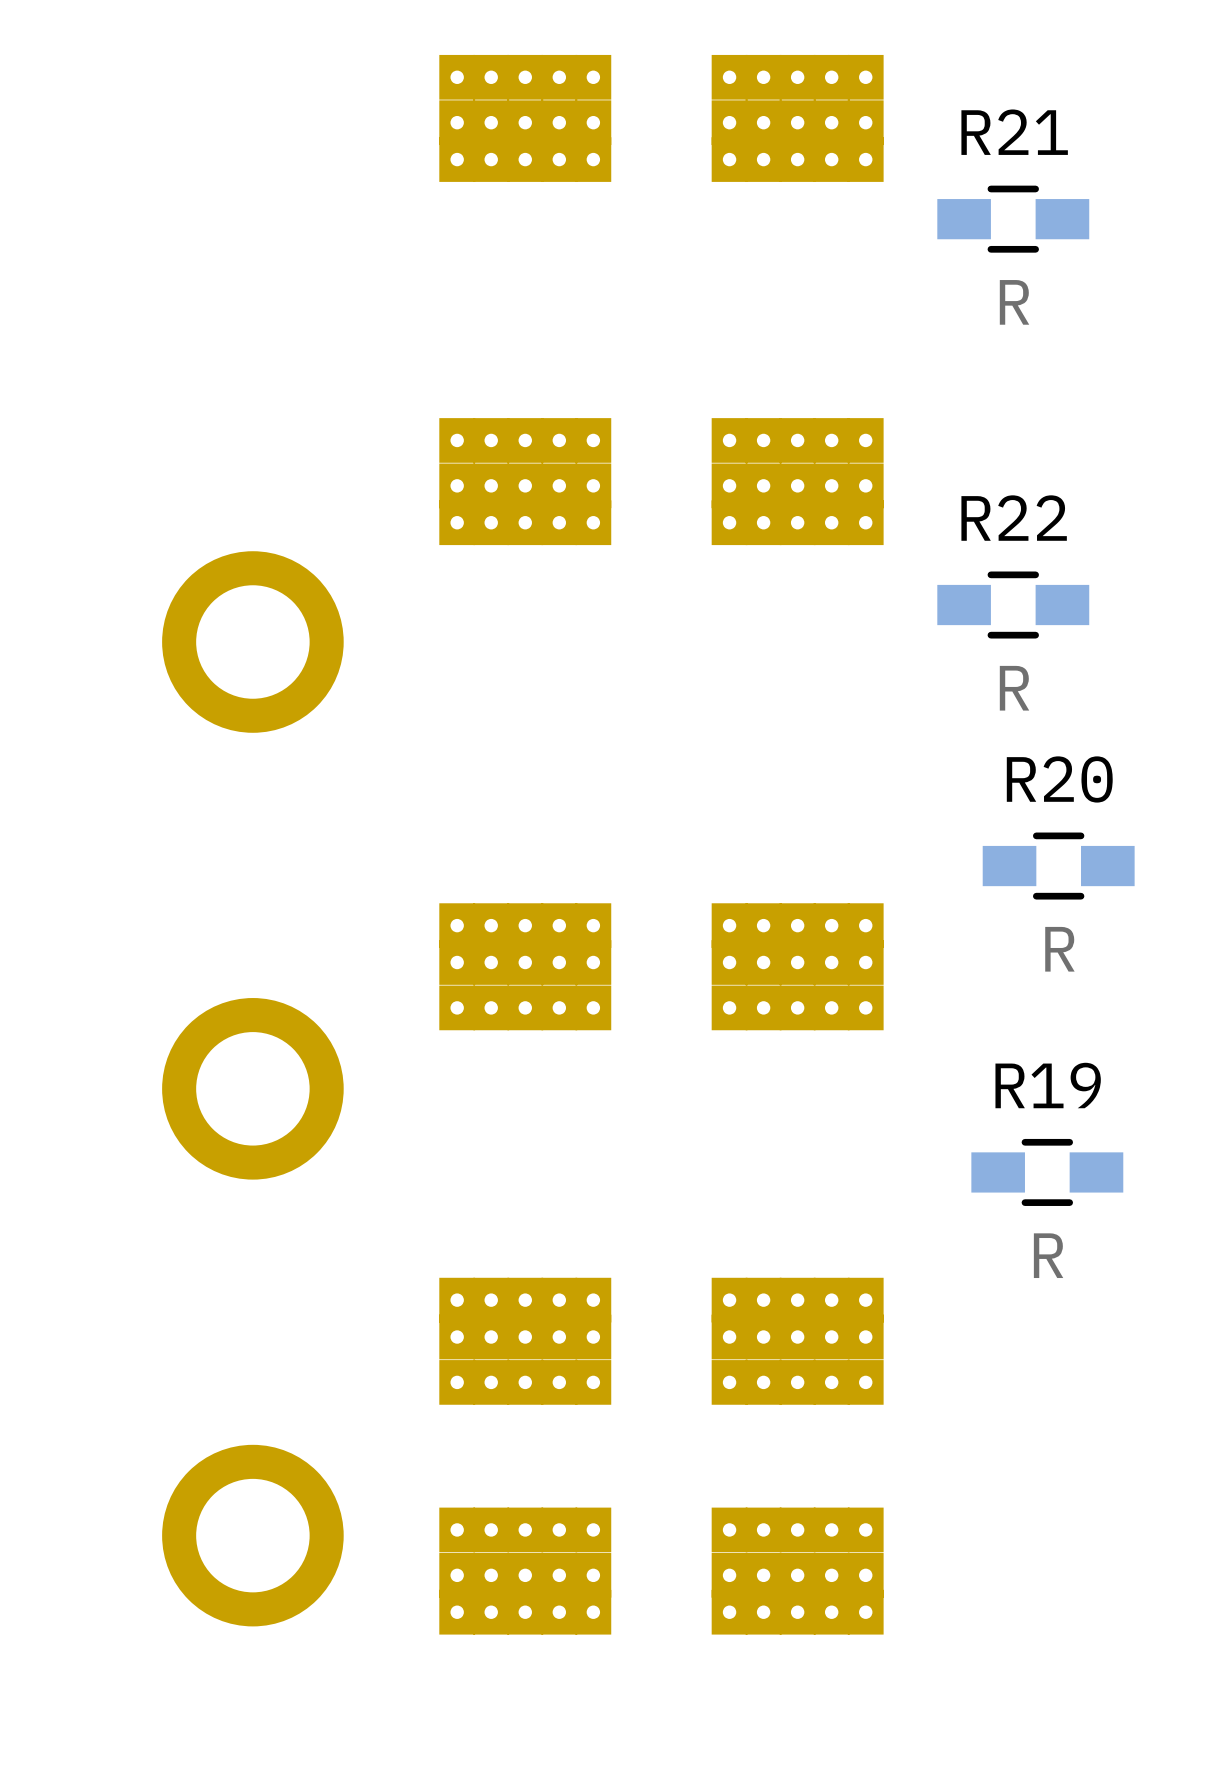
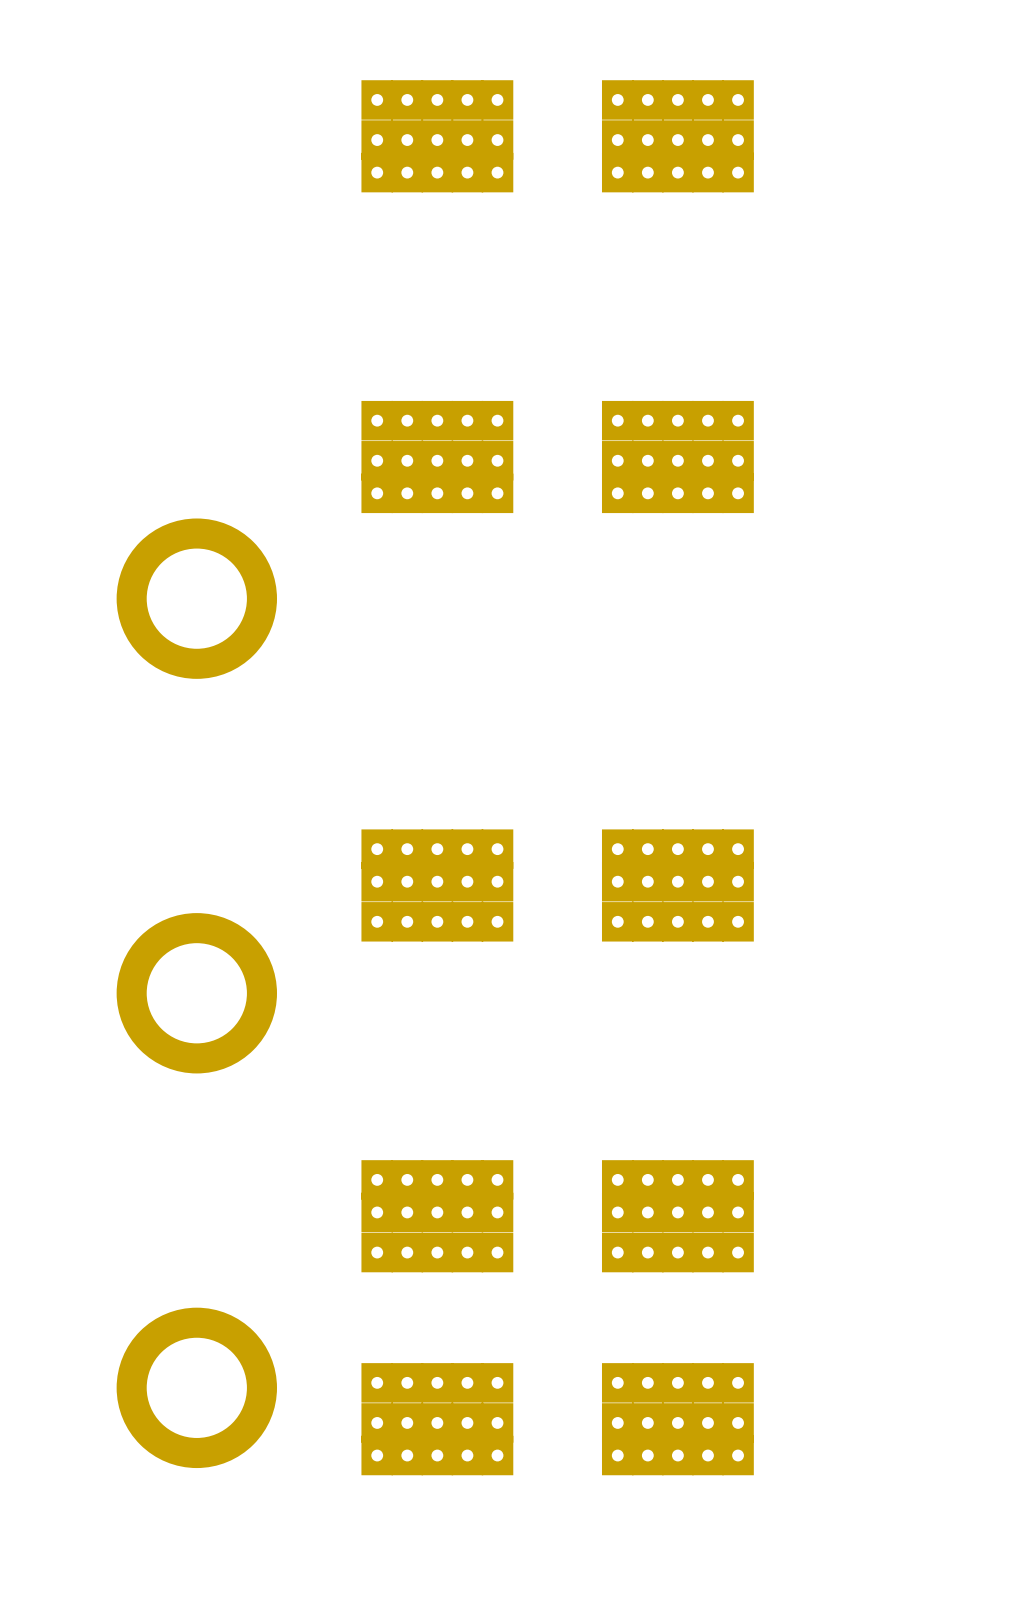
R21: R (1013, 219) -> none
R22: R (1013, 605) -> none
R20: R (1058, 866) -> none
R19: R (1047, 1172) -> none

